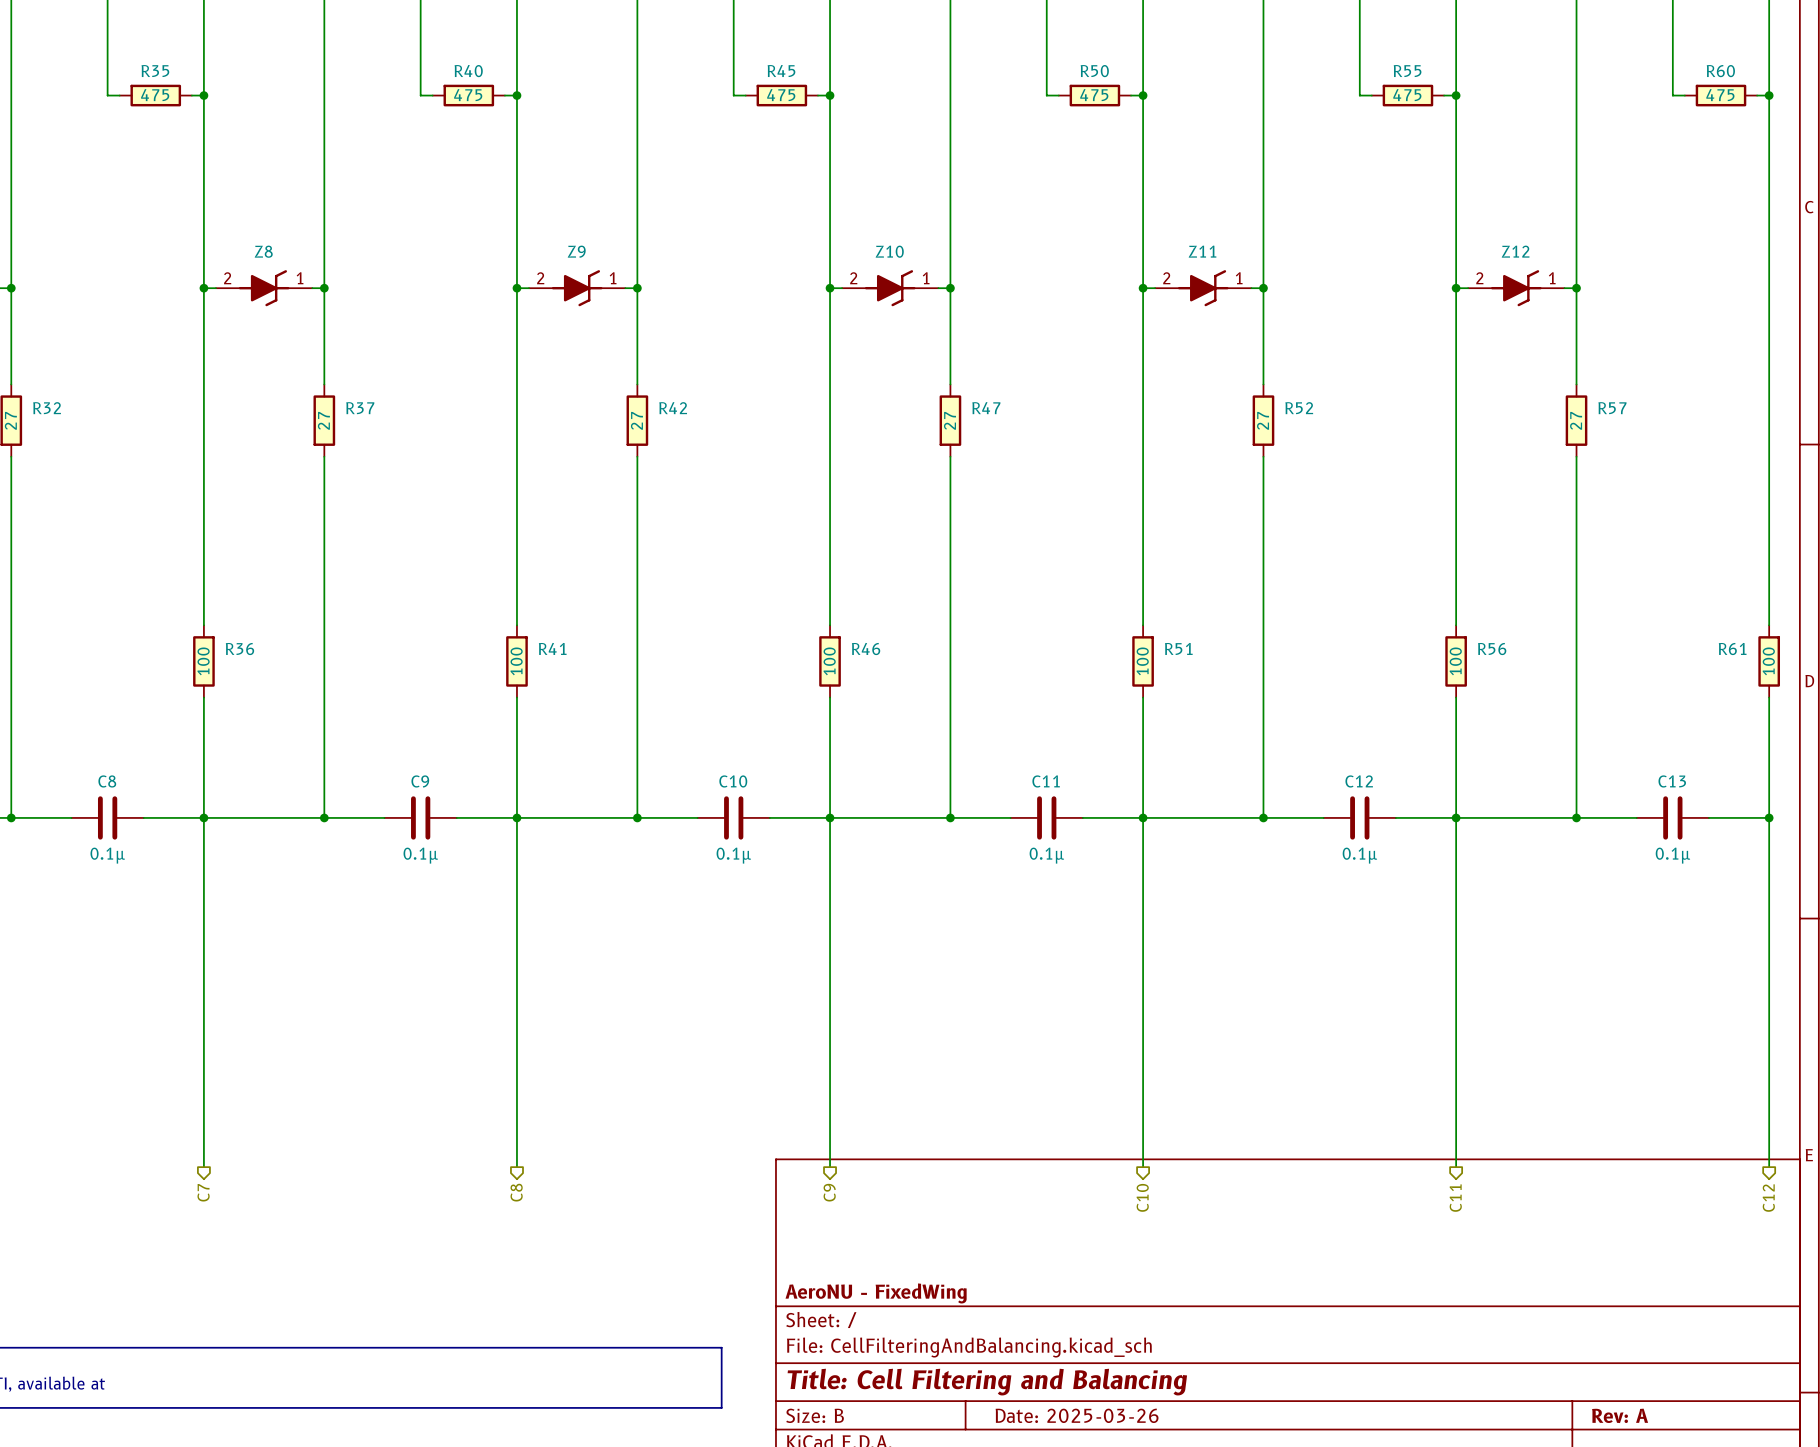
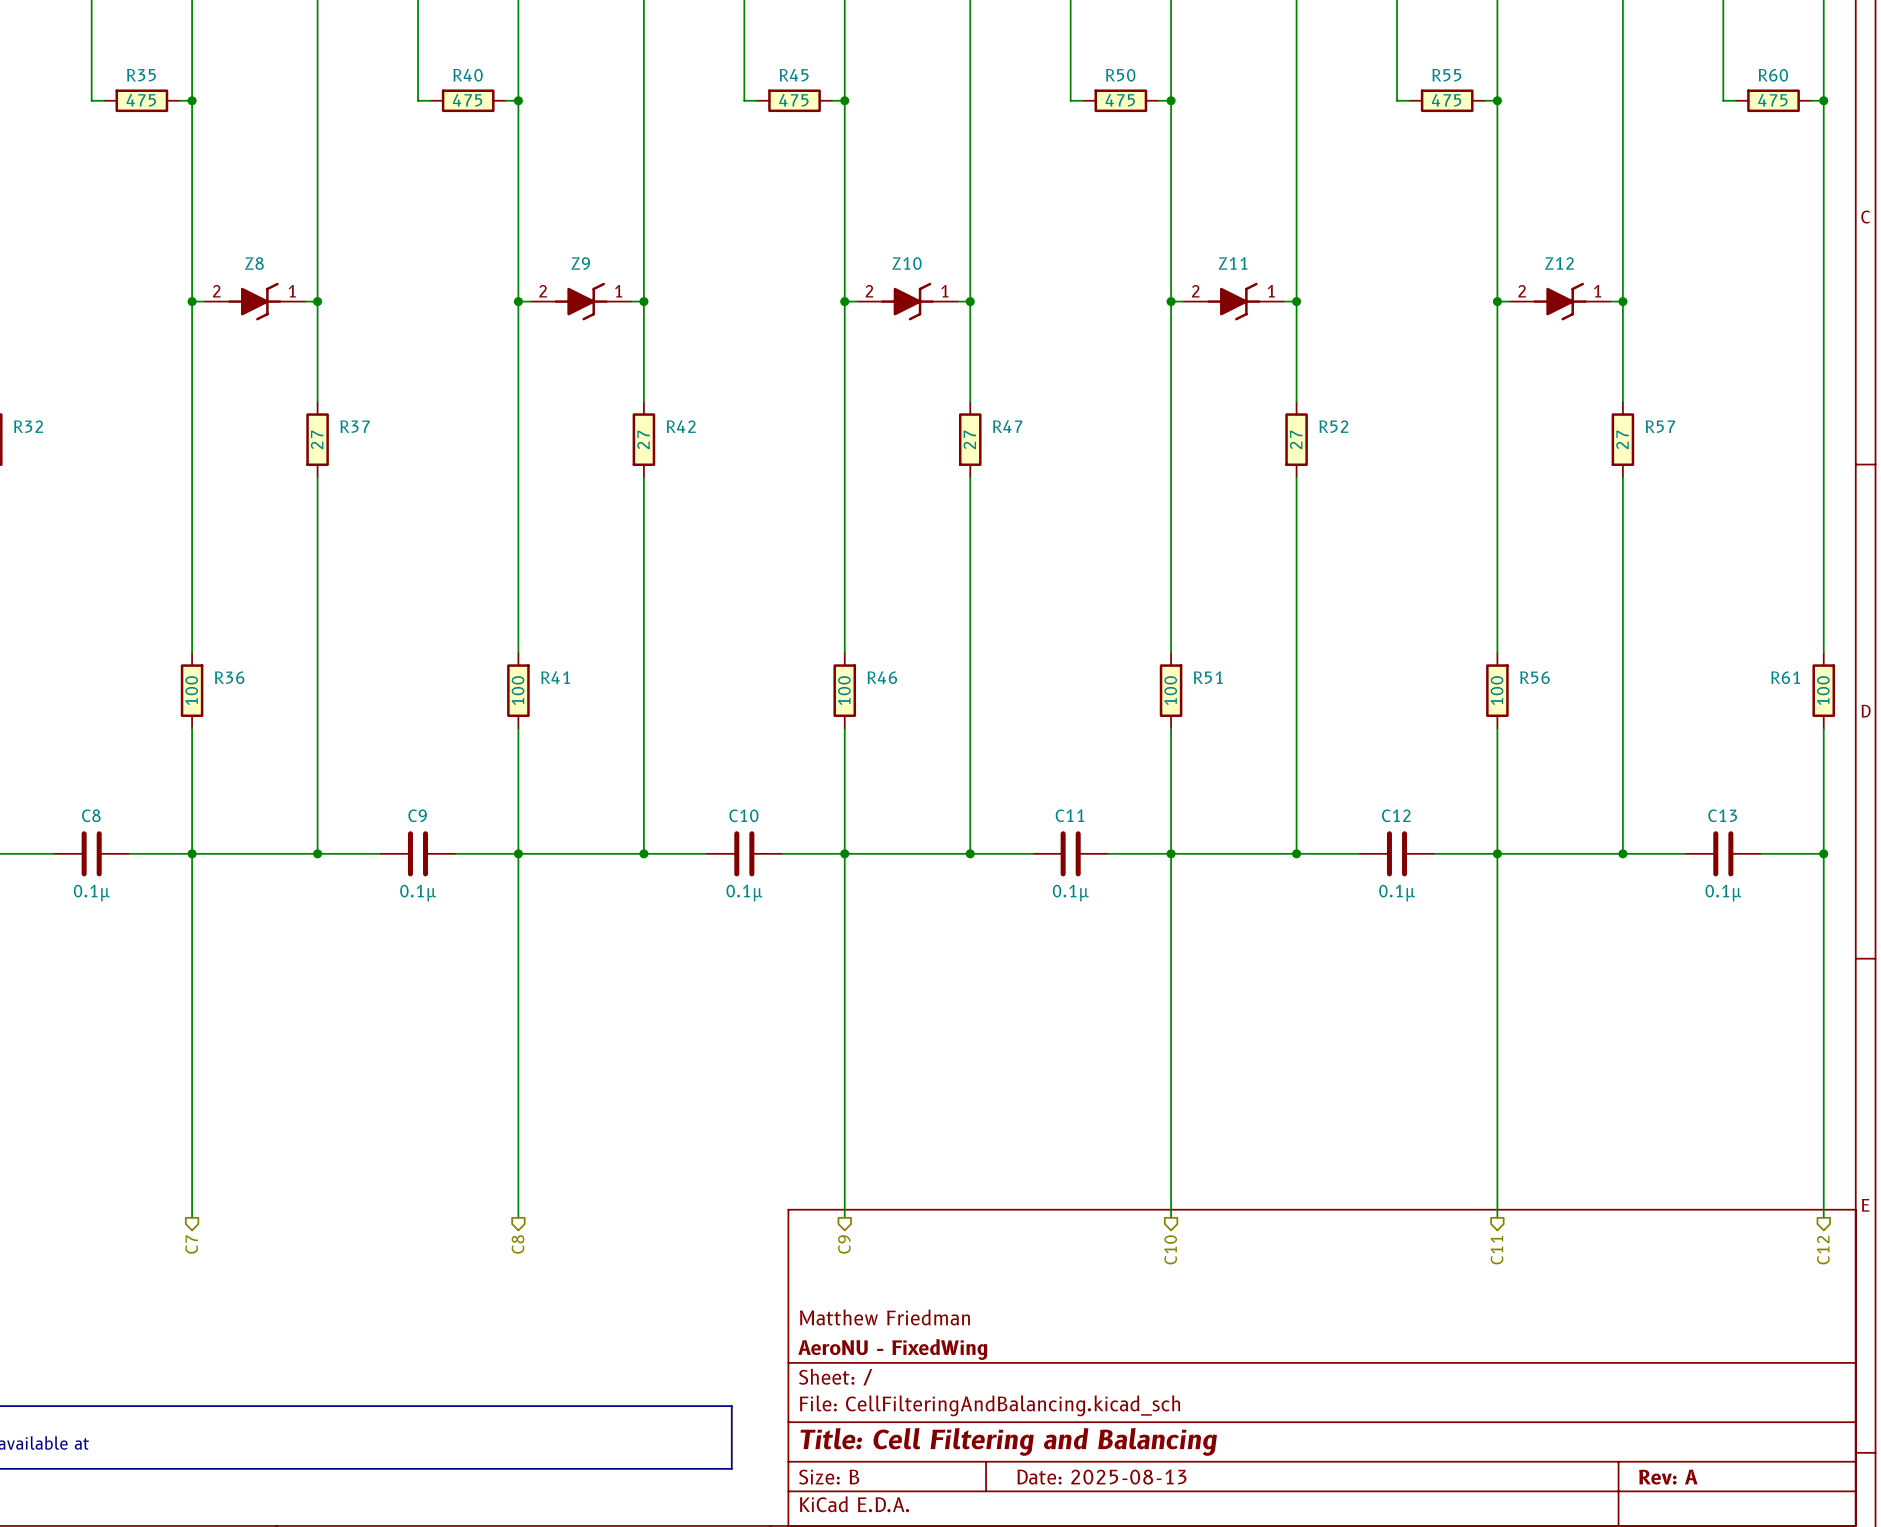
title block: none -> Matthew Friedman (884, 1317)
title block: Date: 2025-03-26 (1077, 1415) -> Date: 2025-08-13 (1101, 1477)

